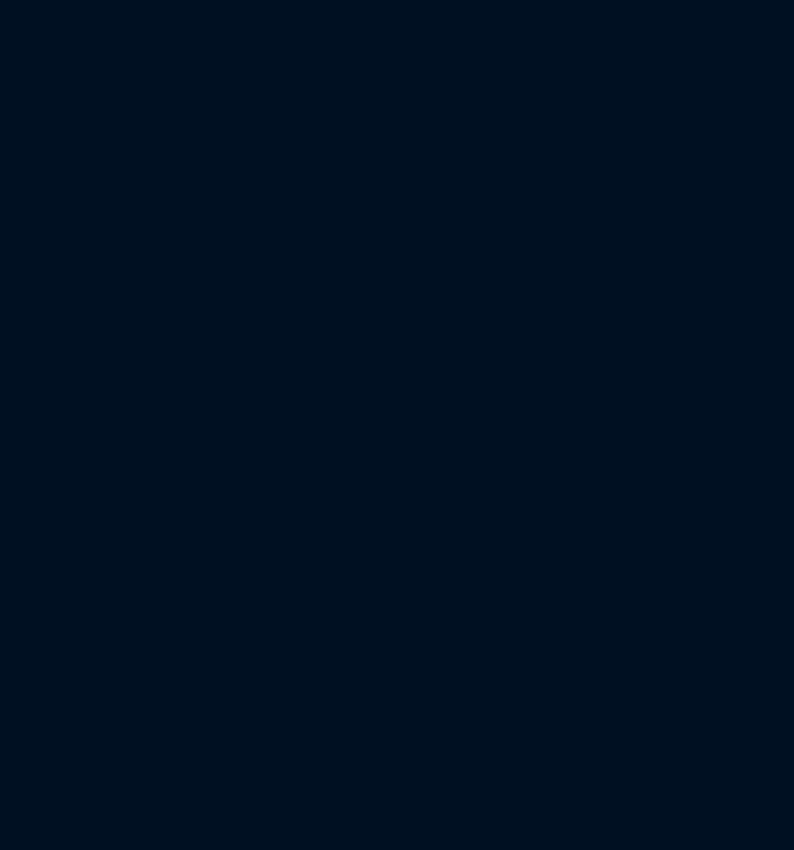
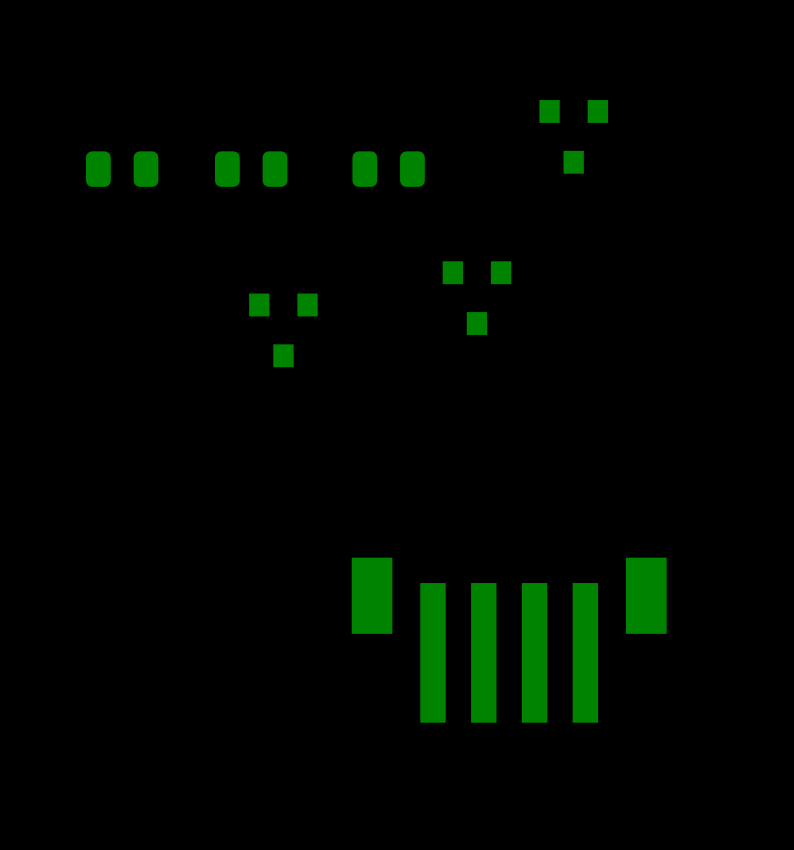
part: none -> (573, 136)
part: none -> (122, 169)
part: none -> (251, 169)
part: none -> (388, 169)
part: none -> (476, 298)
part: none -> (283, 330)
part: none -> (509, 640)

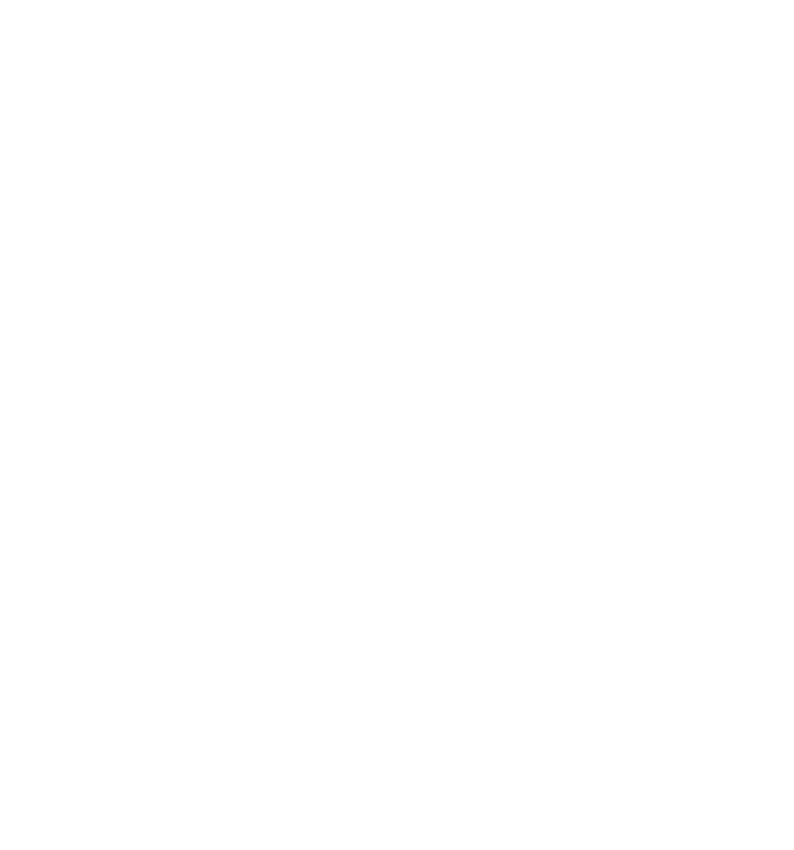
part: (573, 136) -> none
part: (122, 169) -> none
part: (251, 169) -> none
part: (388, 169) -> none
part: (476, 298) -> none
part: (283, 330) -> none
part: (509, 640) -> none

